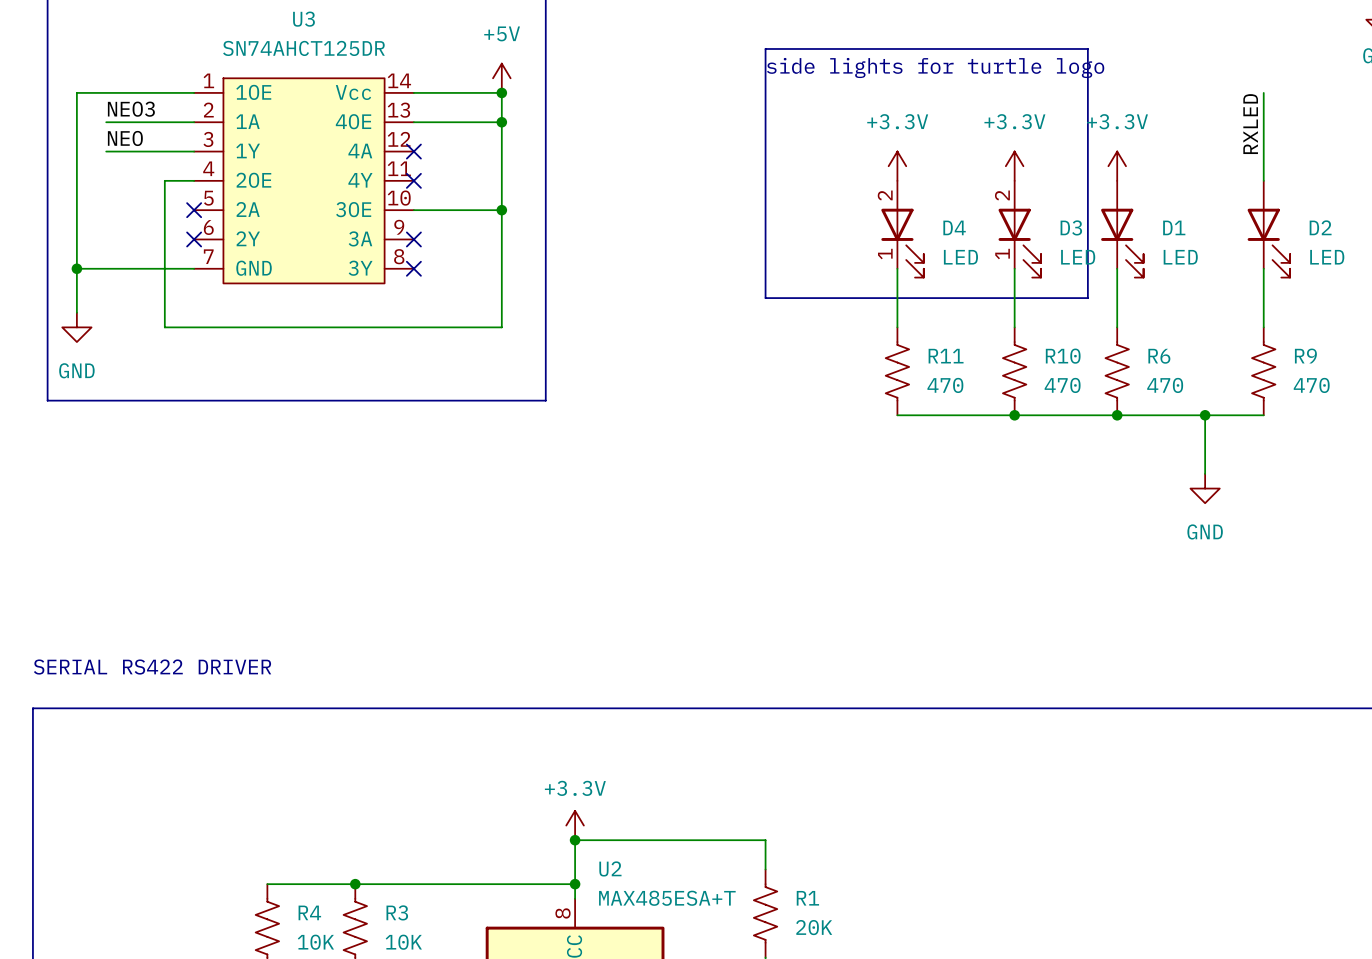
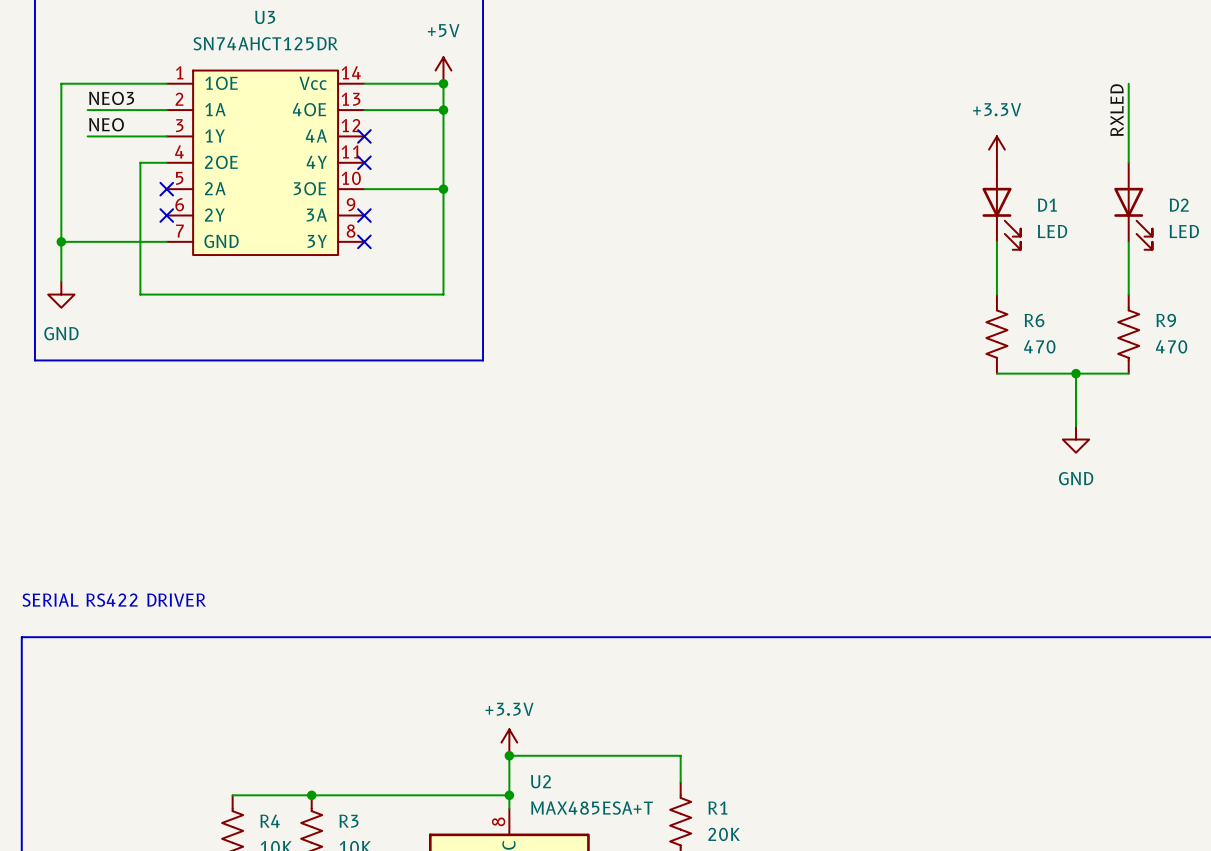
line: (765, 48) (1087, 48) (1087, 298) (765, 298) (765, 48) -> none
text: side lights for turtle logo (935, 67) -> none
power symbol: +3.3V (897, 166) -> none
power symbol: +3.3V (1014, 166) -> none
D4: LED (902, 229) -> none
D3: LED (1019, 229) -> none
wire: (897, 268) (897, 327) -> none
wire: (1014, 268) (1014, 327) -> none
R11: 470 (897, 371) -> none
R10: 470 (1014, 371) -> none
wire: (897, 415) (1117, 415) -> none
junction: (1014, 415) -> none
junction: (1117, 415) -> none

